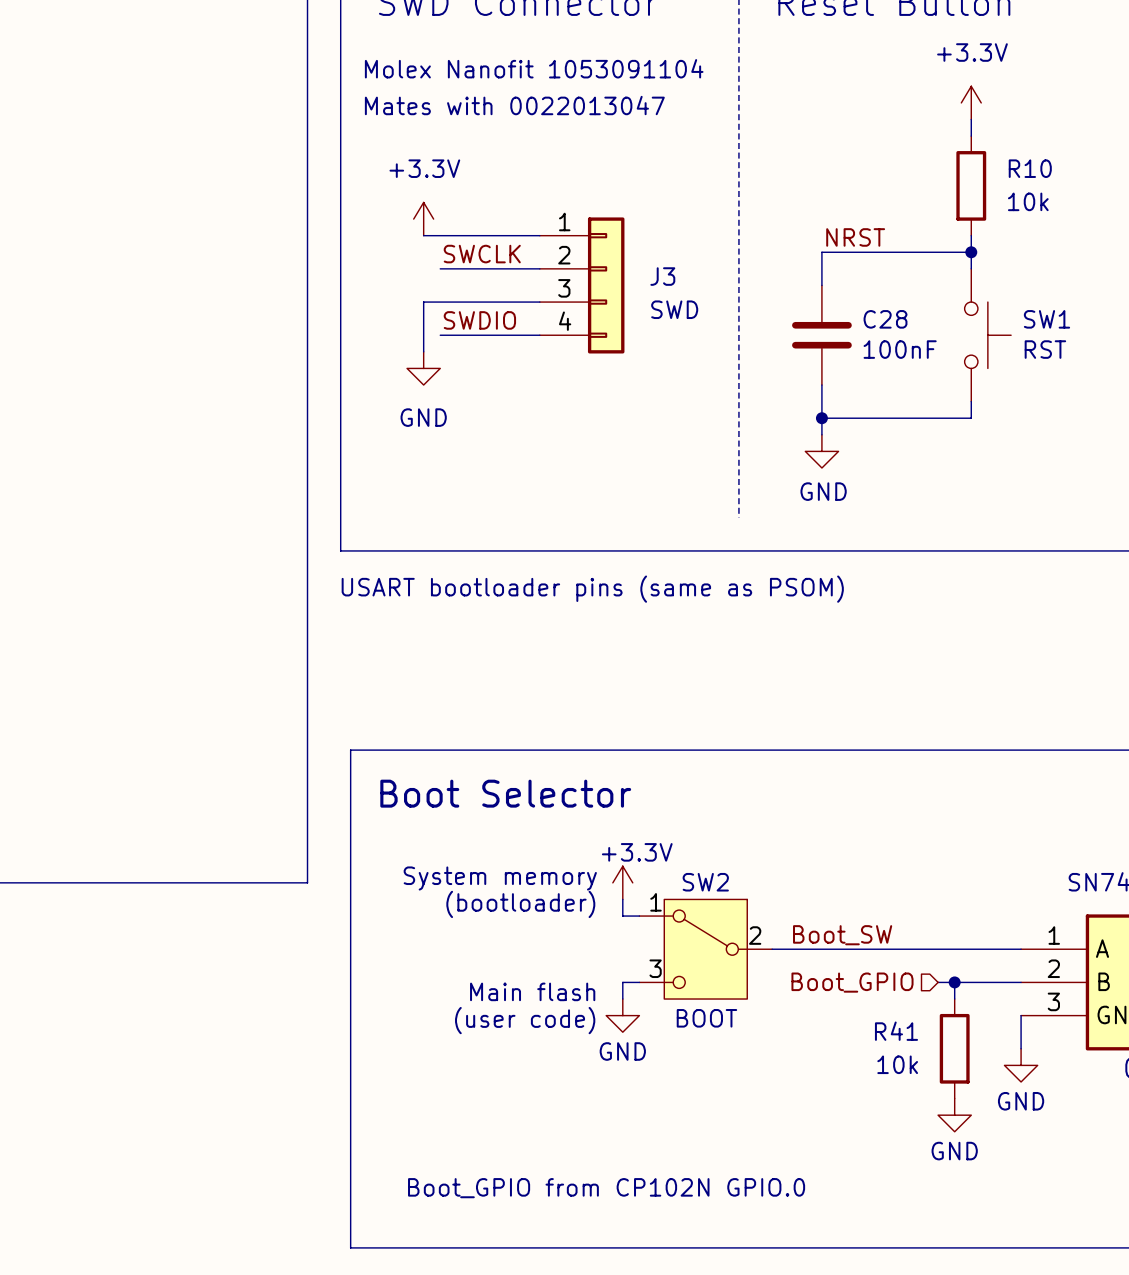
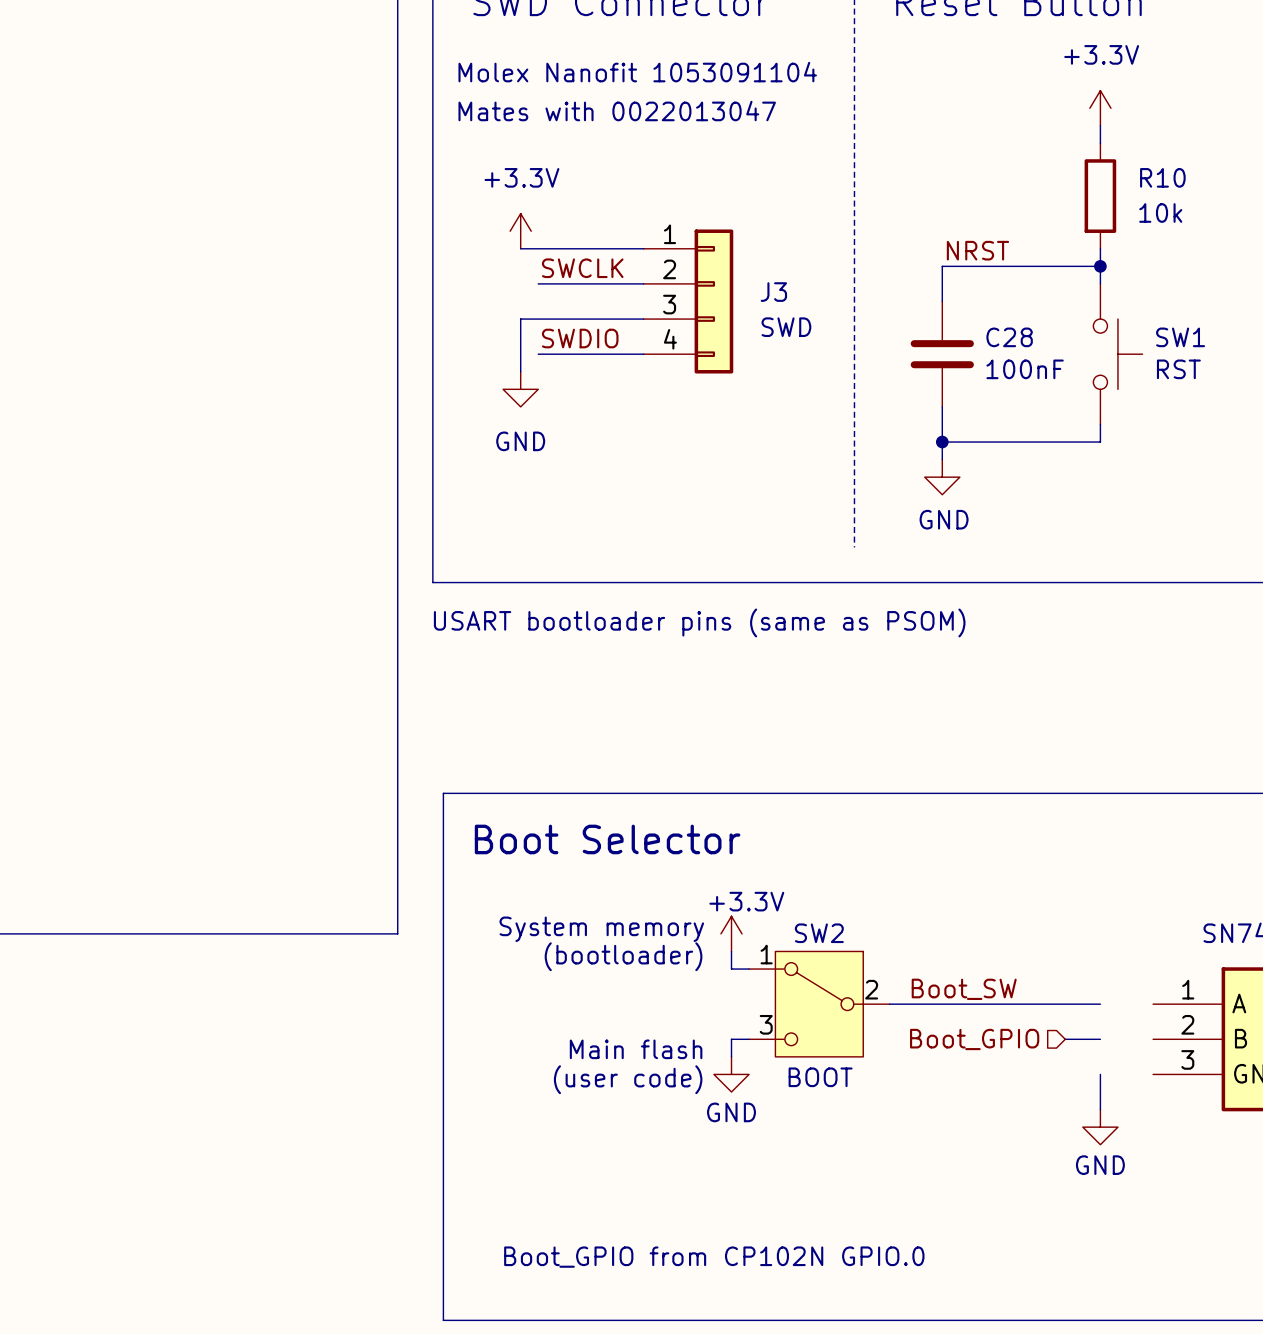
wire: (971, 949) (1021, 949) -> none
wire: (954, 982) (954, 999) -> none
junction: (954, 982) -> none
wire: (971, 982) (1021, 982) -> none
wire: (1021, 1015) (1021, 1048) -> (1100, 1074) (1100, 1109)
R41: 10k (954, 1048) -> none
power symbol: none -> GND (1100, 1127)
power symbol: GND (1021, 1065) -> none
power symbol: GND (954, 1115) -> none

